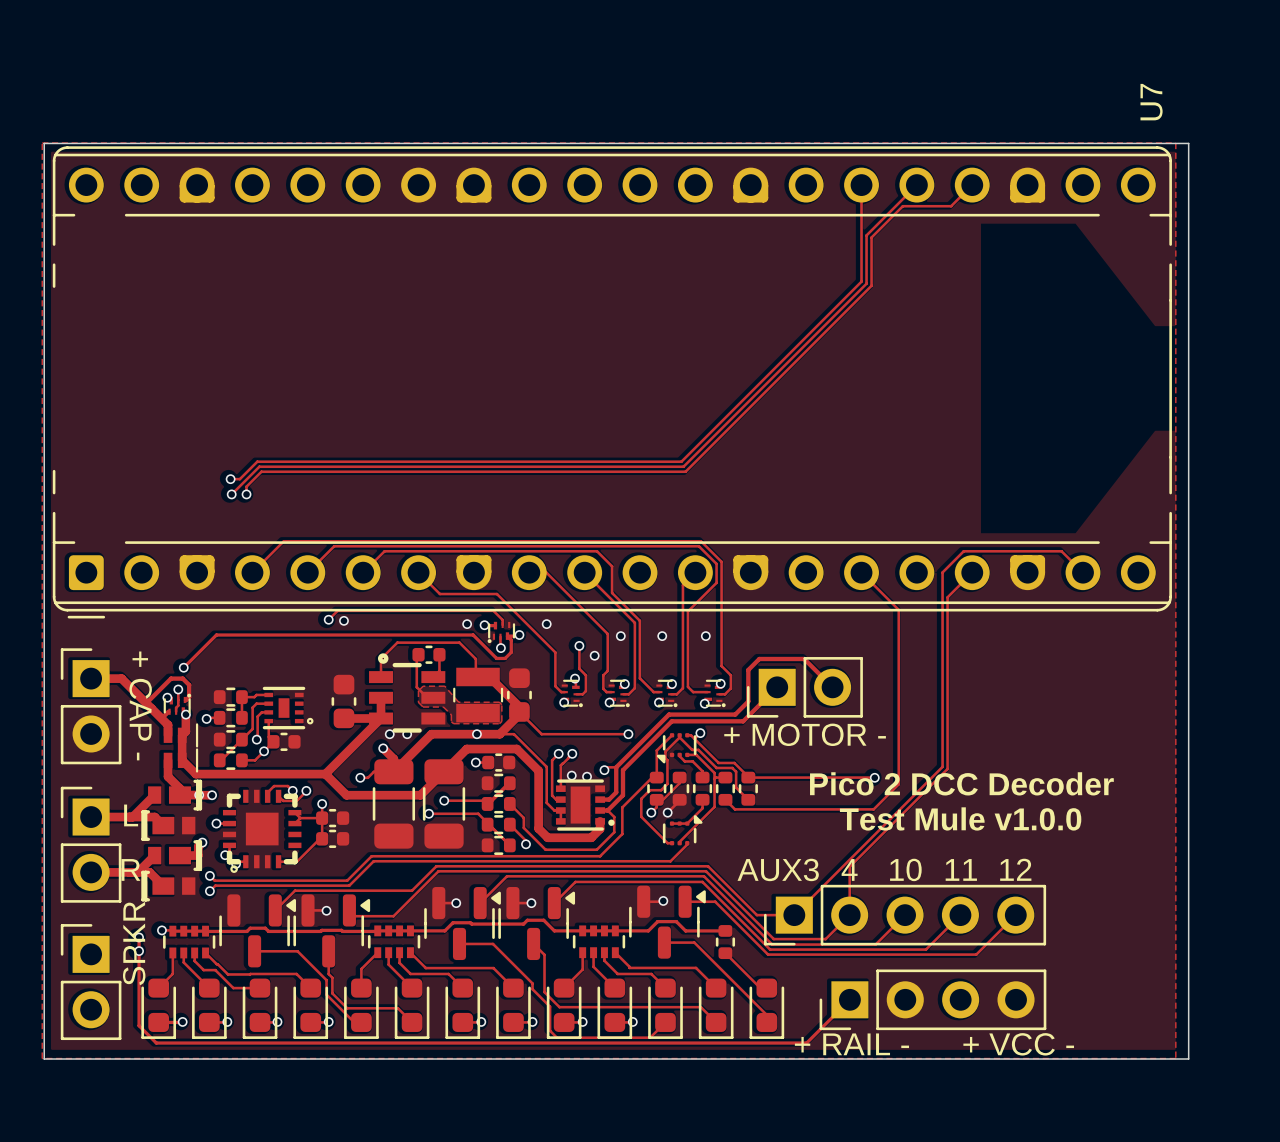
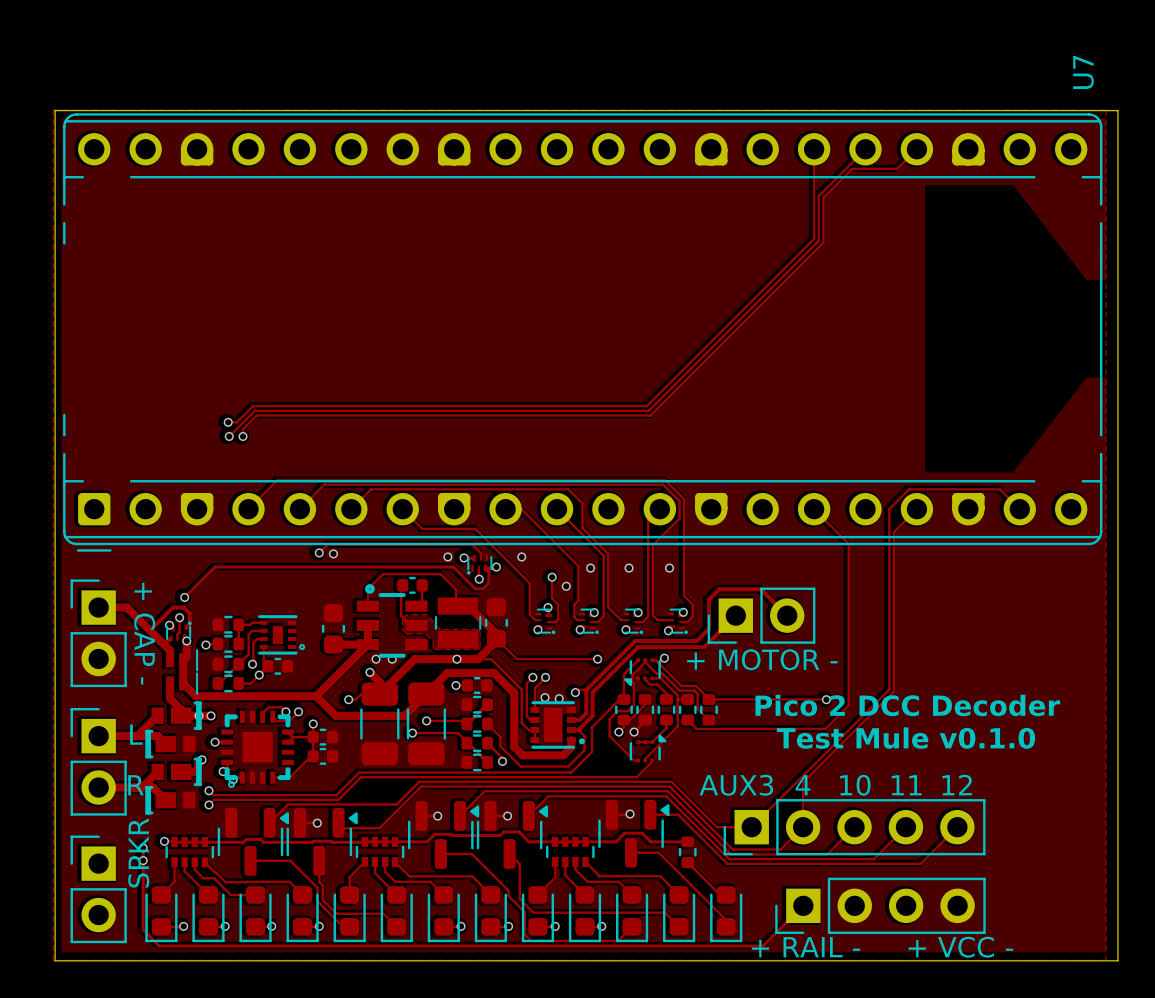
text: Test Mule v1.0.0 (960, 818) -> Test Mule v0.1.0 (905, 738)

